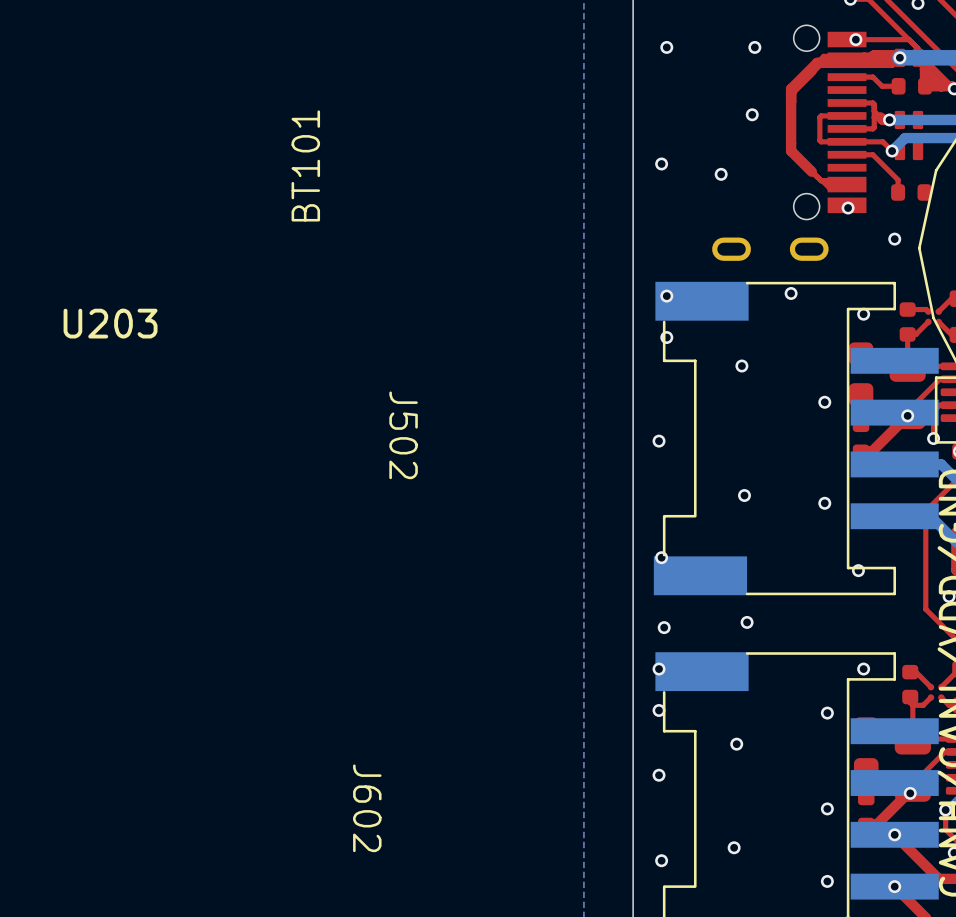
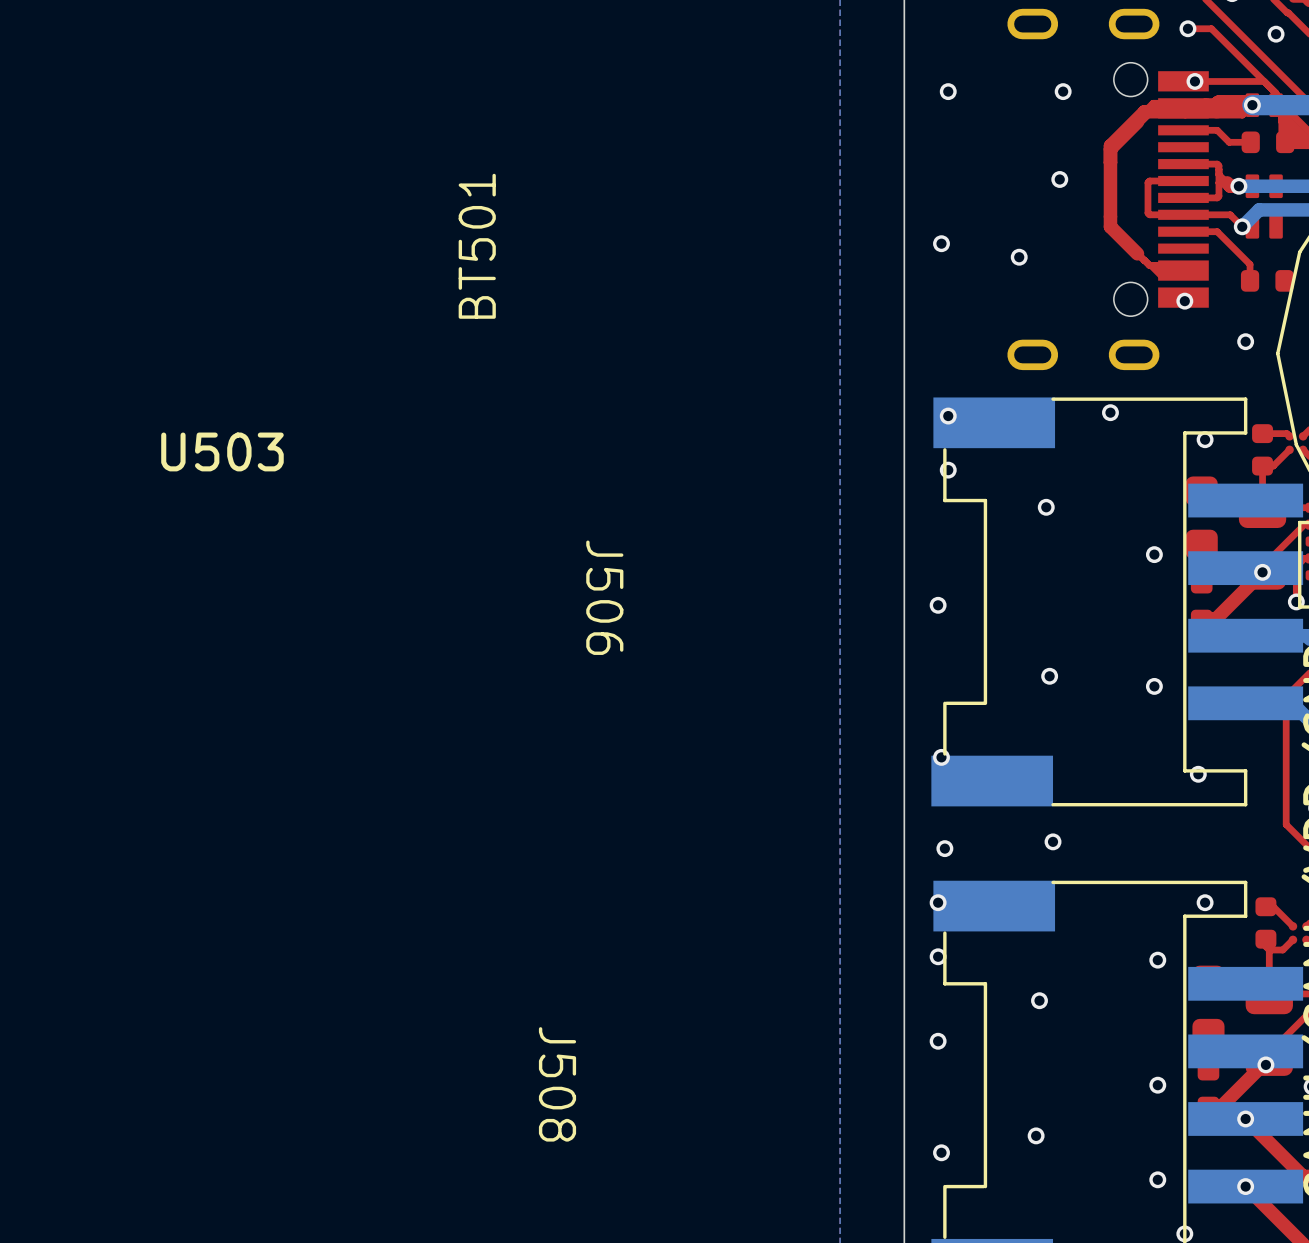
BT101 name: BT101 (305, 165) -> BT501 (477, 246)
U203 name: U203 (110, 323) -> U503 (222, 451)
J502 name: J502 (403, 435) -> J506 (604, 597)
J602 name: J602 (367, 808) -> J508 (557, 1084)

